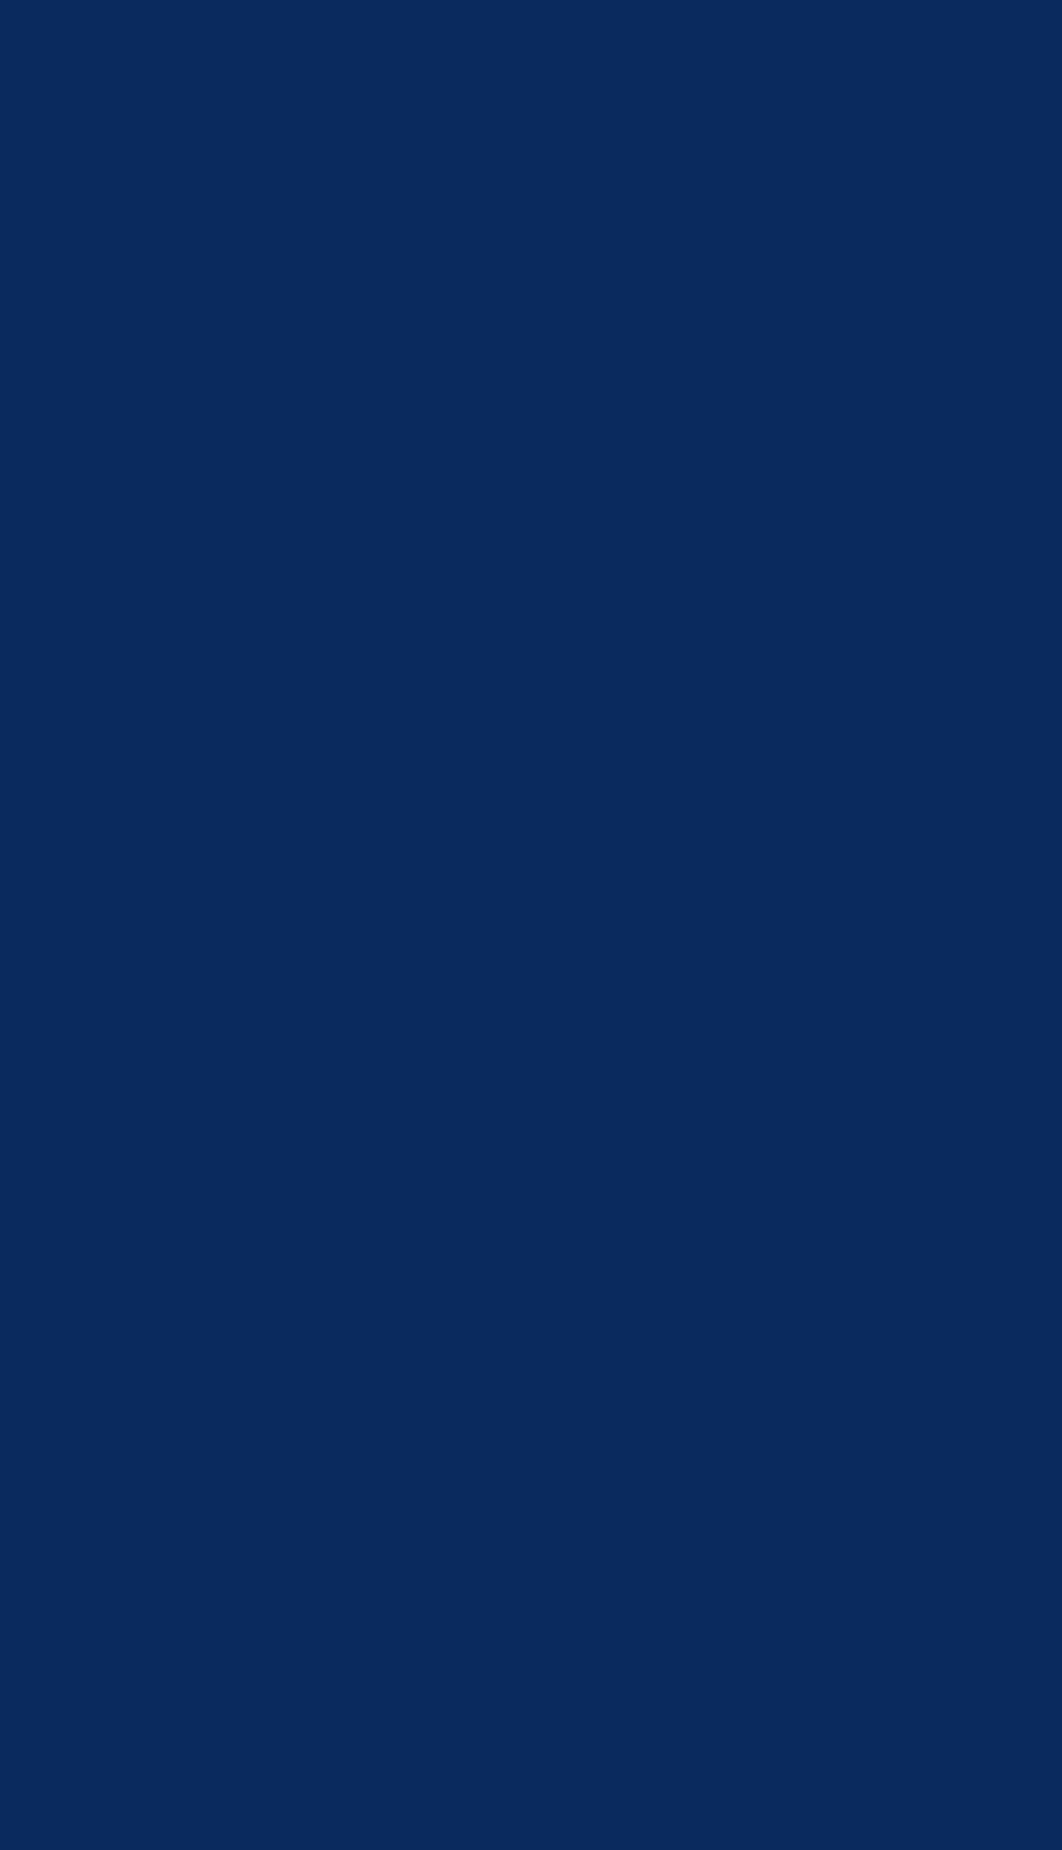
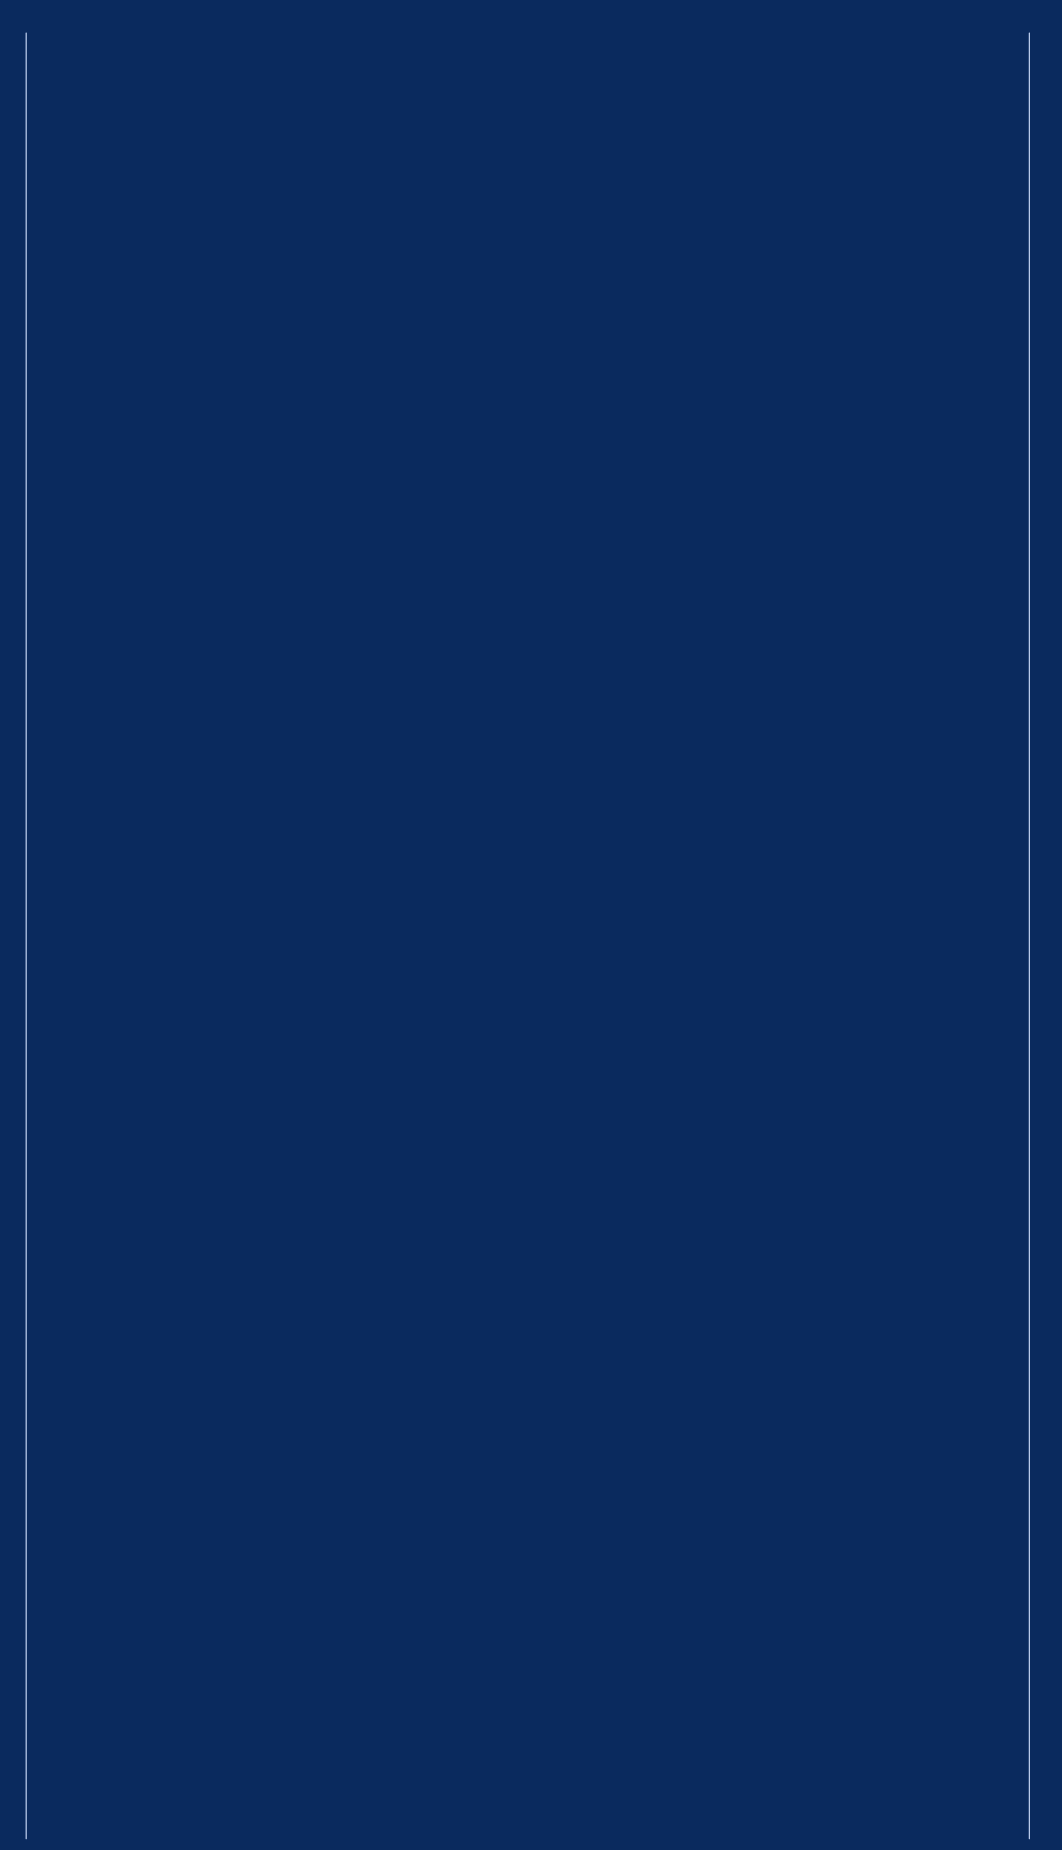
board edge: none -> (26, 33) (26, 1838)
board edge: none -> (1029, 33) (1029, 1838)

